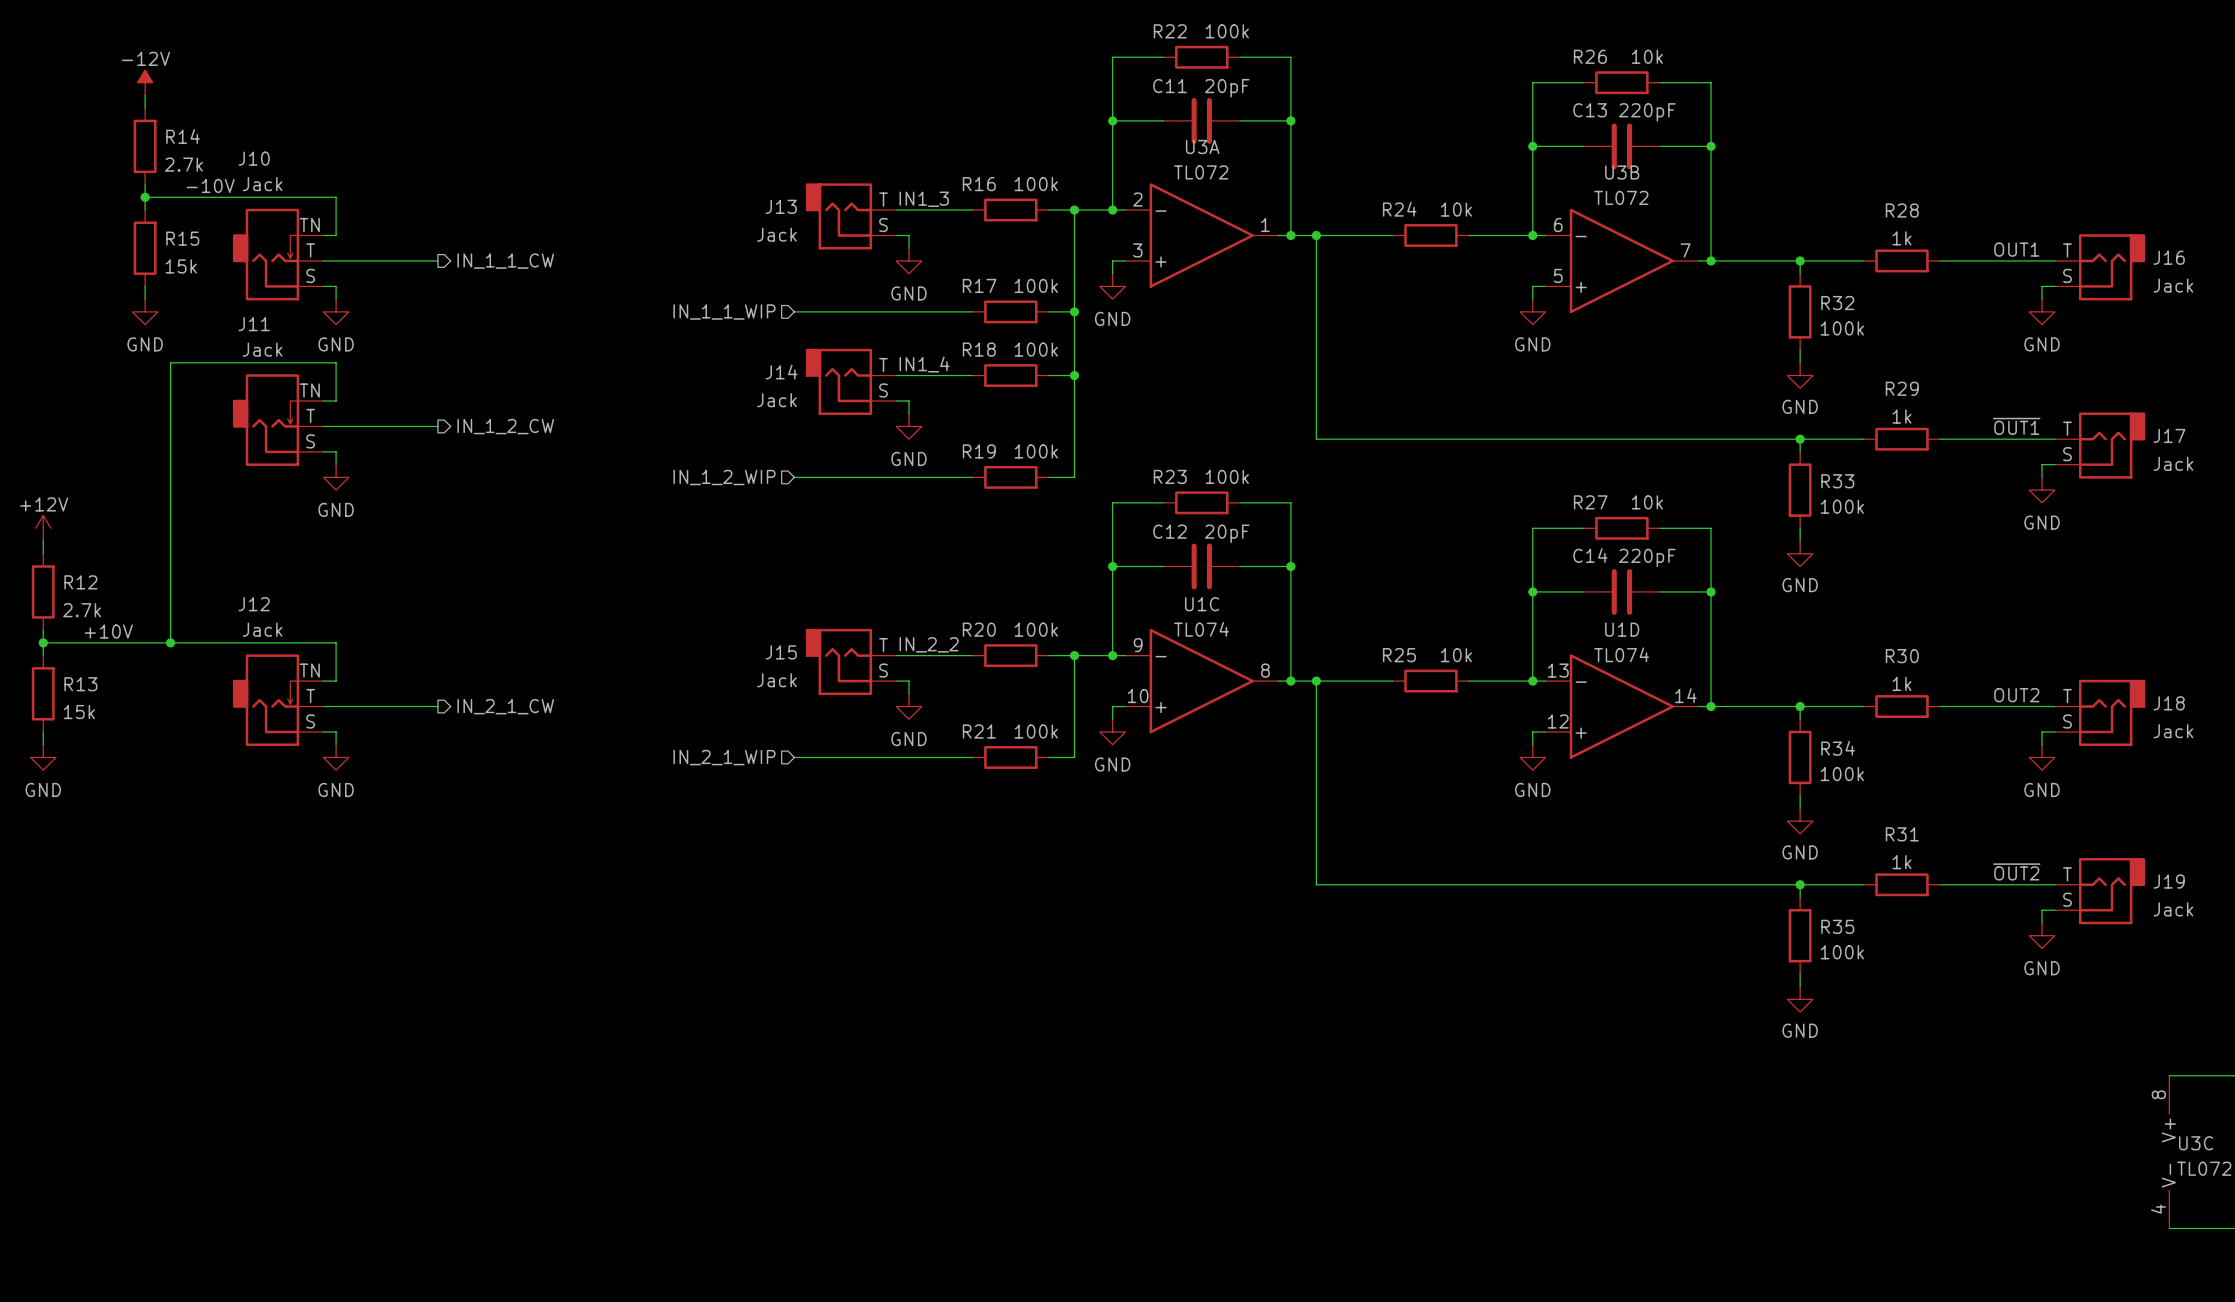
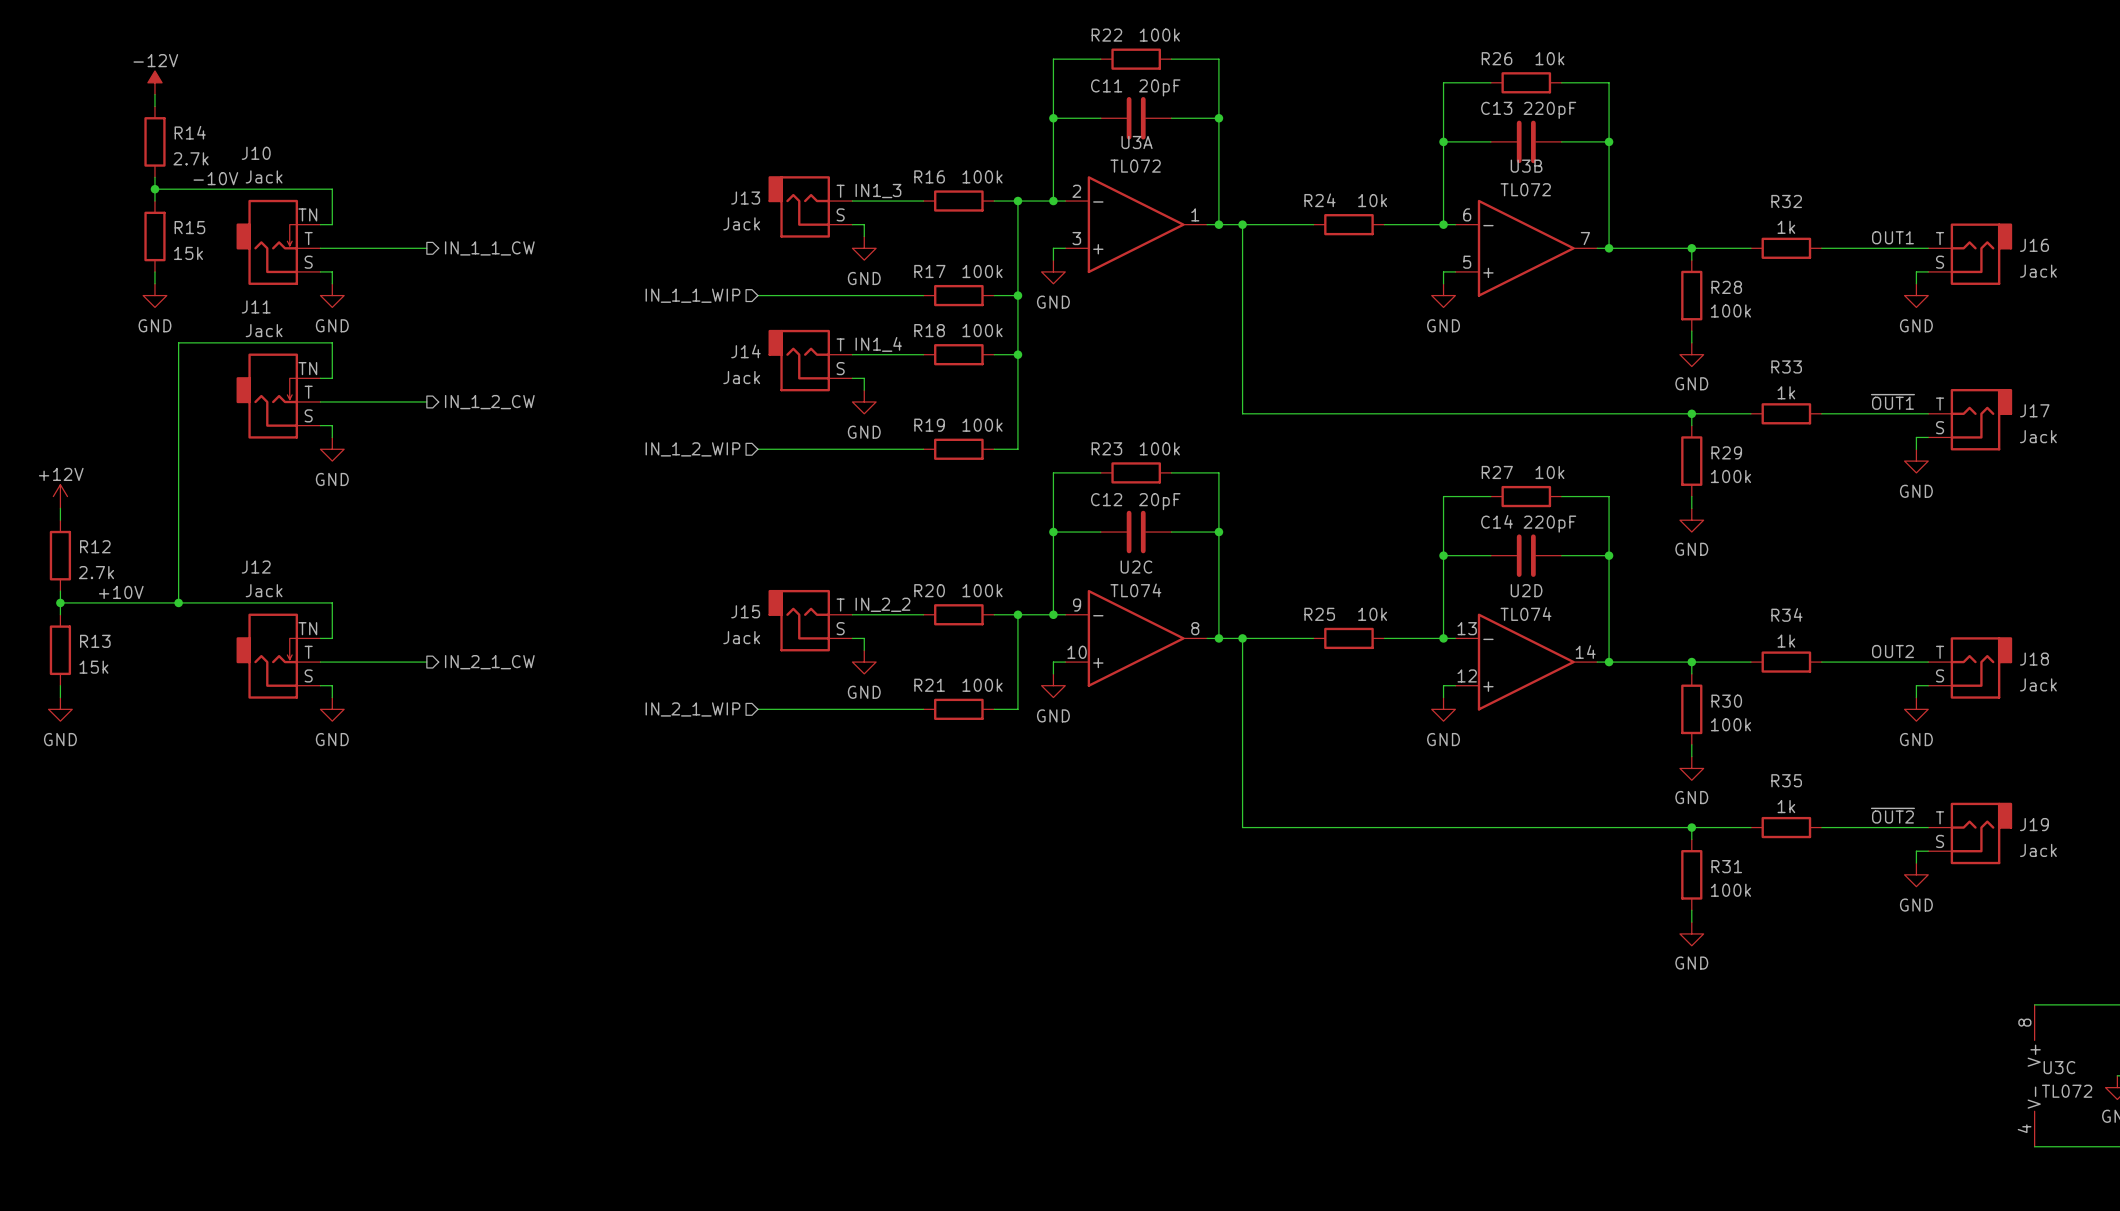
R28 name: R28 (1902, 210) -> R32 (1786, 201)
R32 name: R32 (1837, 303) -> R28 (1726, 287)
R29 name: R29 (1902, 388) -> R33 (1786, 366)
R33 name: R33 (1837, 481) -> R29 (1726, 452)
U1C name: U1C (1202, 604) -> U2C (1136, 567)
U1D name: U1D (1622, 629) -> U2D (1526, 590)
R30 name: R30 (1902, 656) -> R34 (1786, 614)
R34 name: R34 (1838, 748) -> R30 (1726, 701)
R31 name: R31 (1902, 834) -> R35 (1786, 780)
R35 name: R35 (1837, 926) -> R31 (1726, 866)

